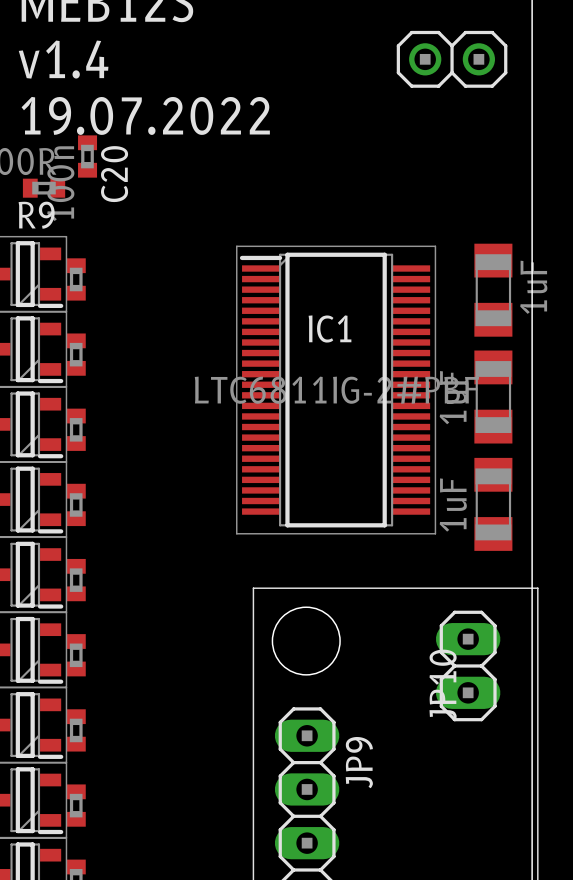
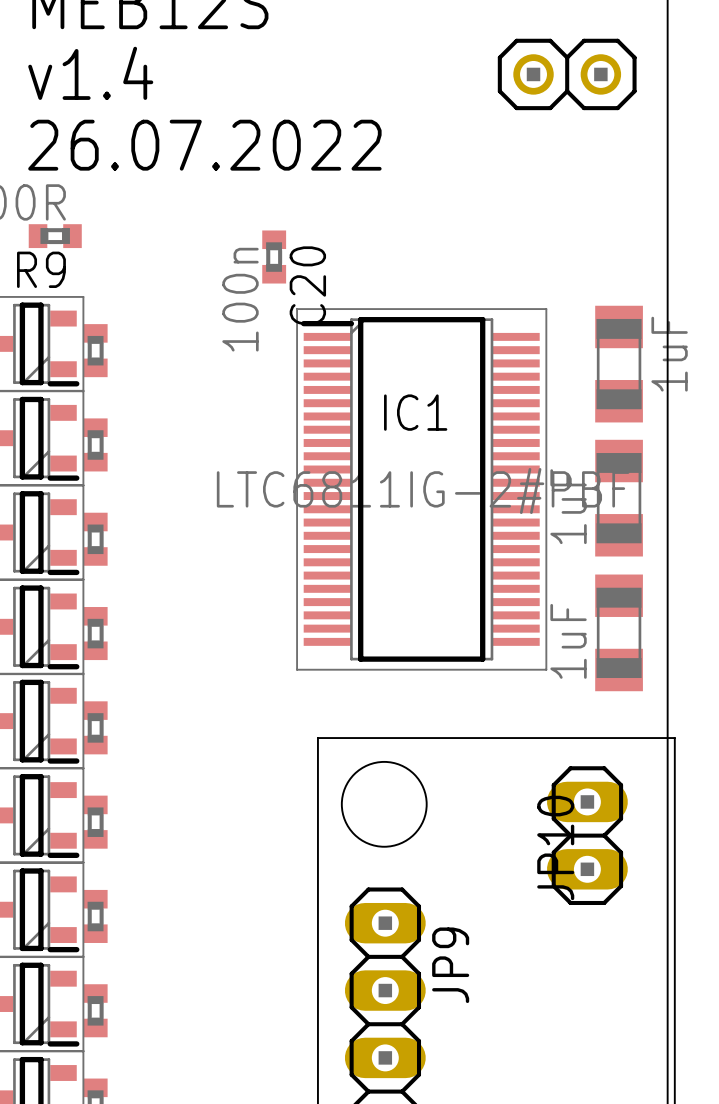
text: 19.07.2022 (145, 115) -> 26.07.2022 (204, 145)
C20 position: (87, 156) -> (274, 257)

